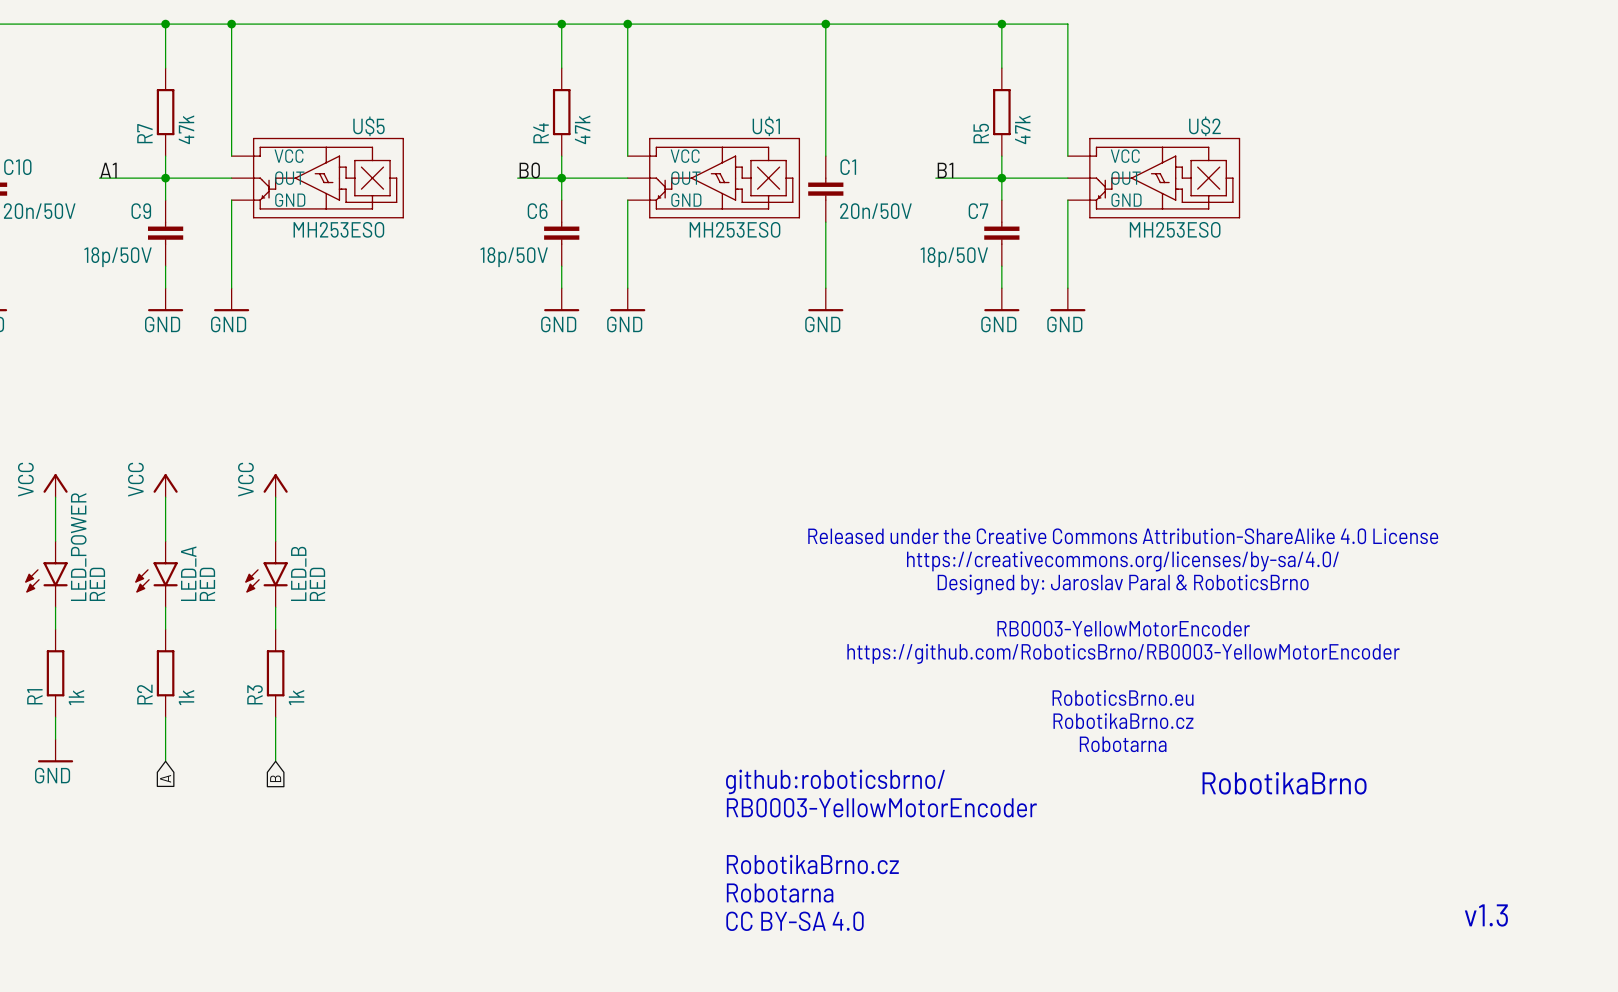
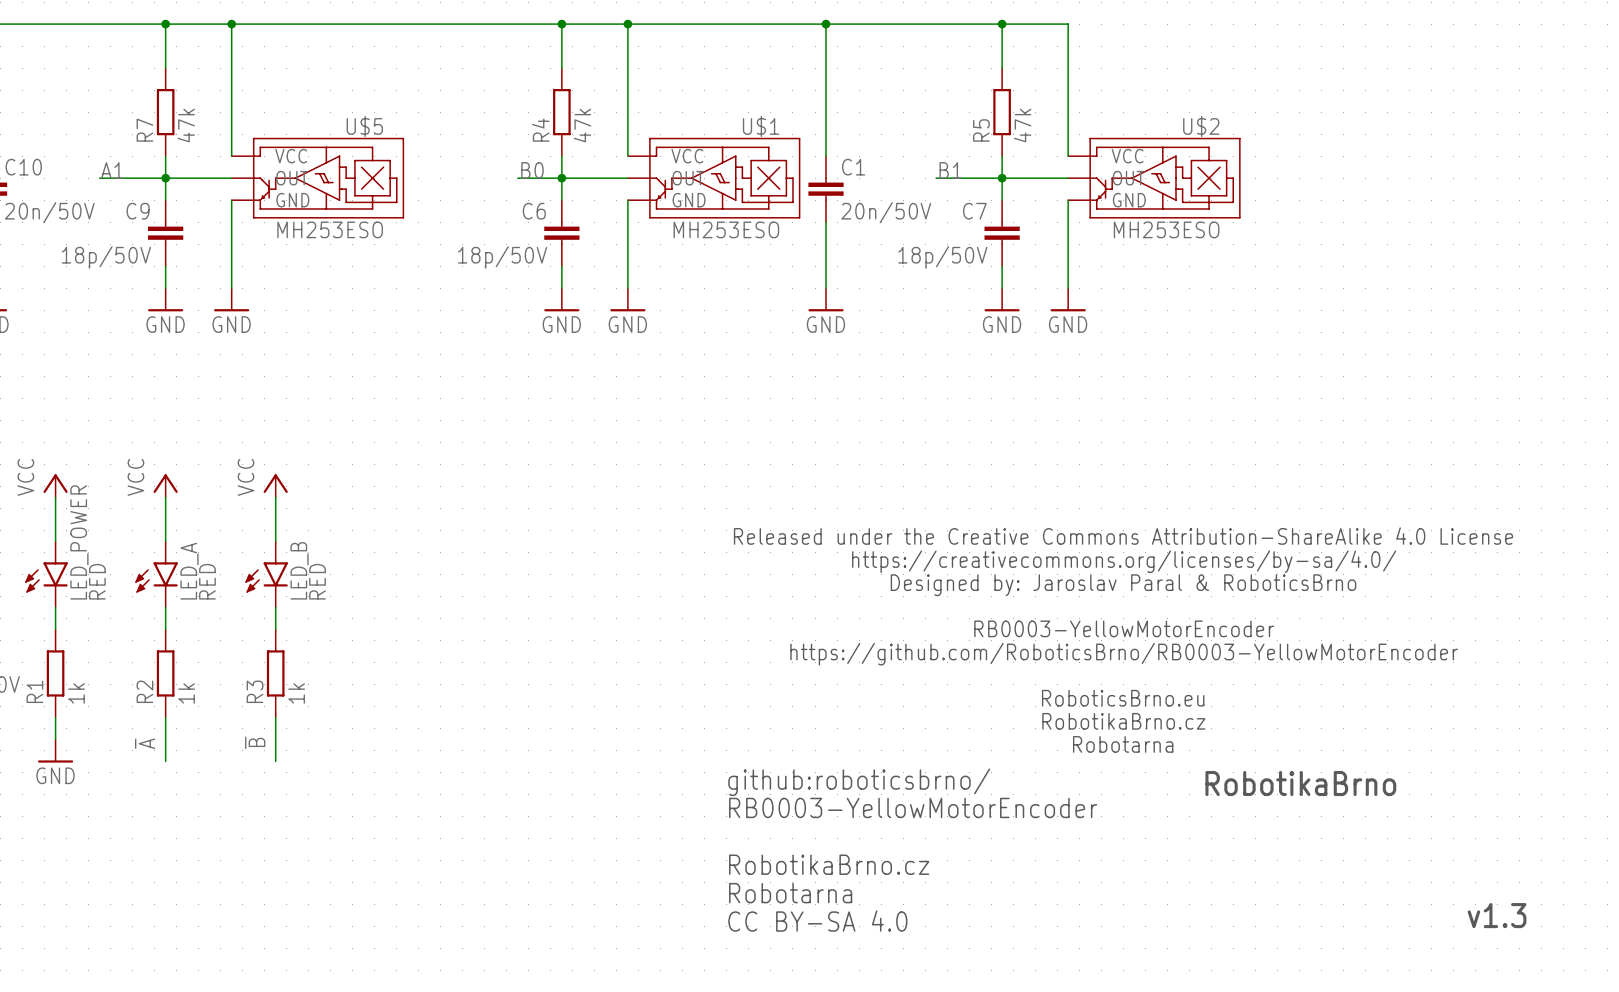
label: none -> ~{A} (145, 743)
label: none -> ~{B} (255, 742)
global label: A (165, 778) -> none
global label: B (275, 778) -> none

